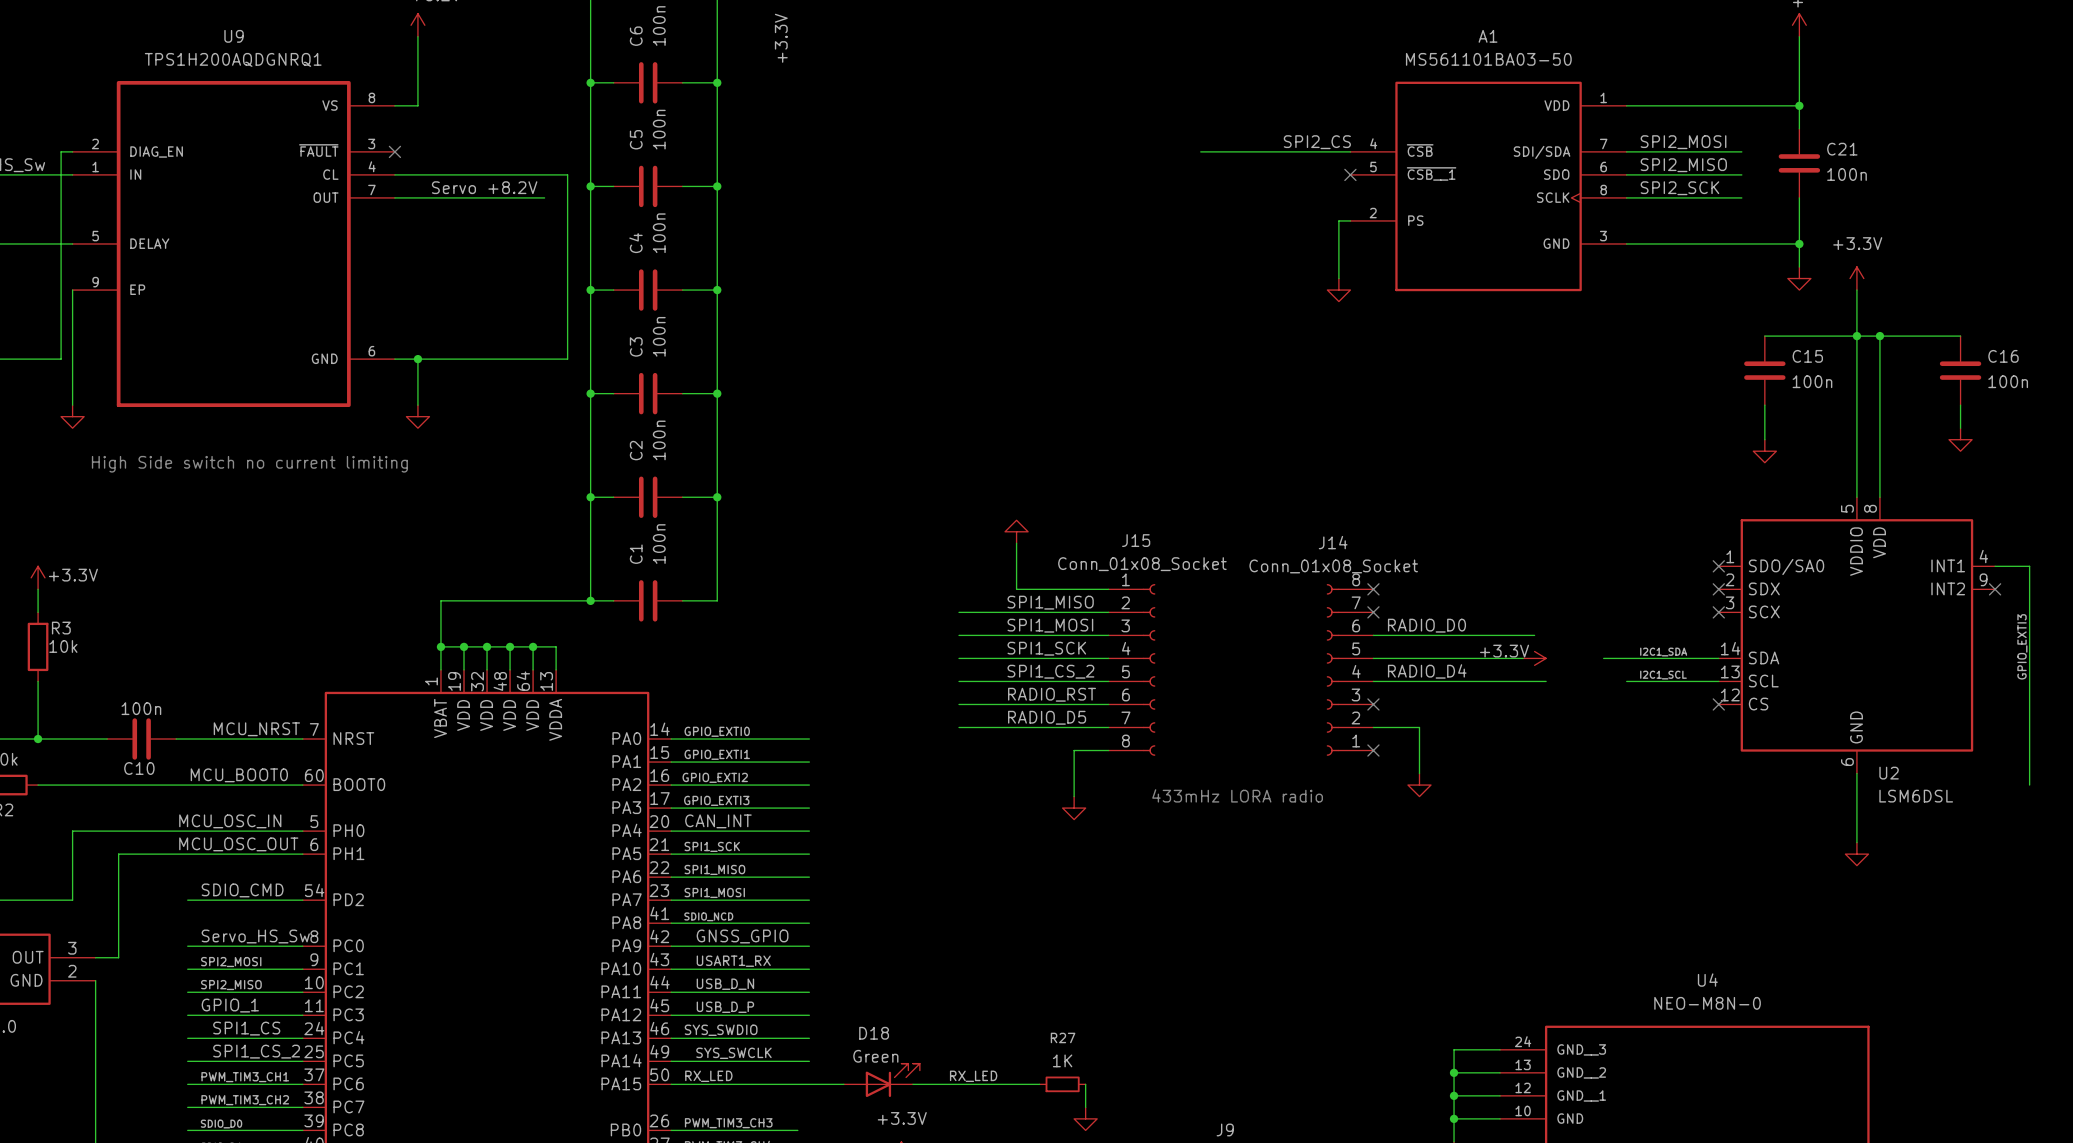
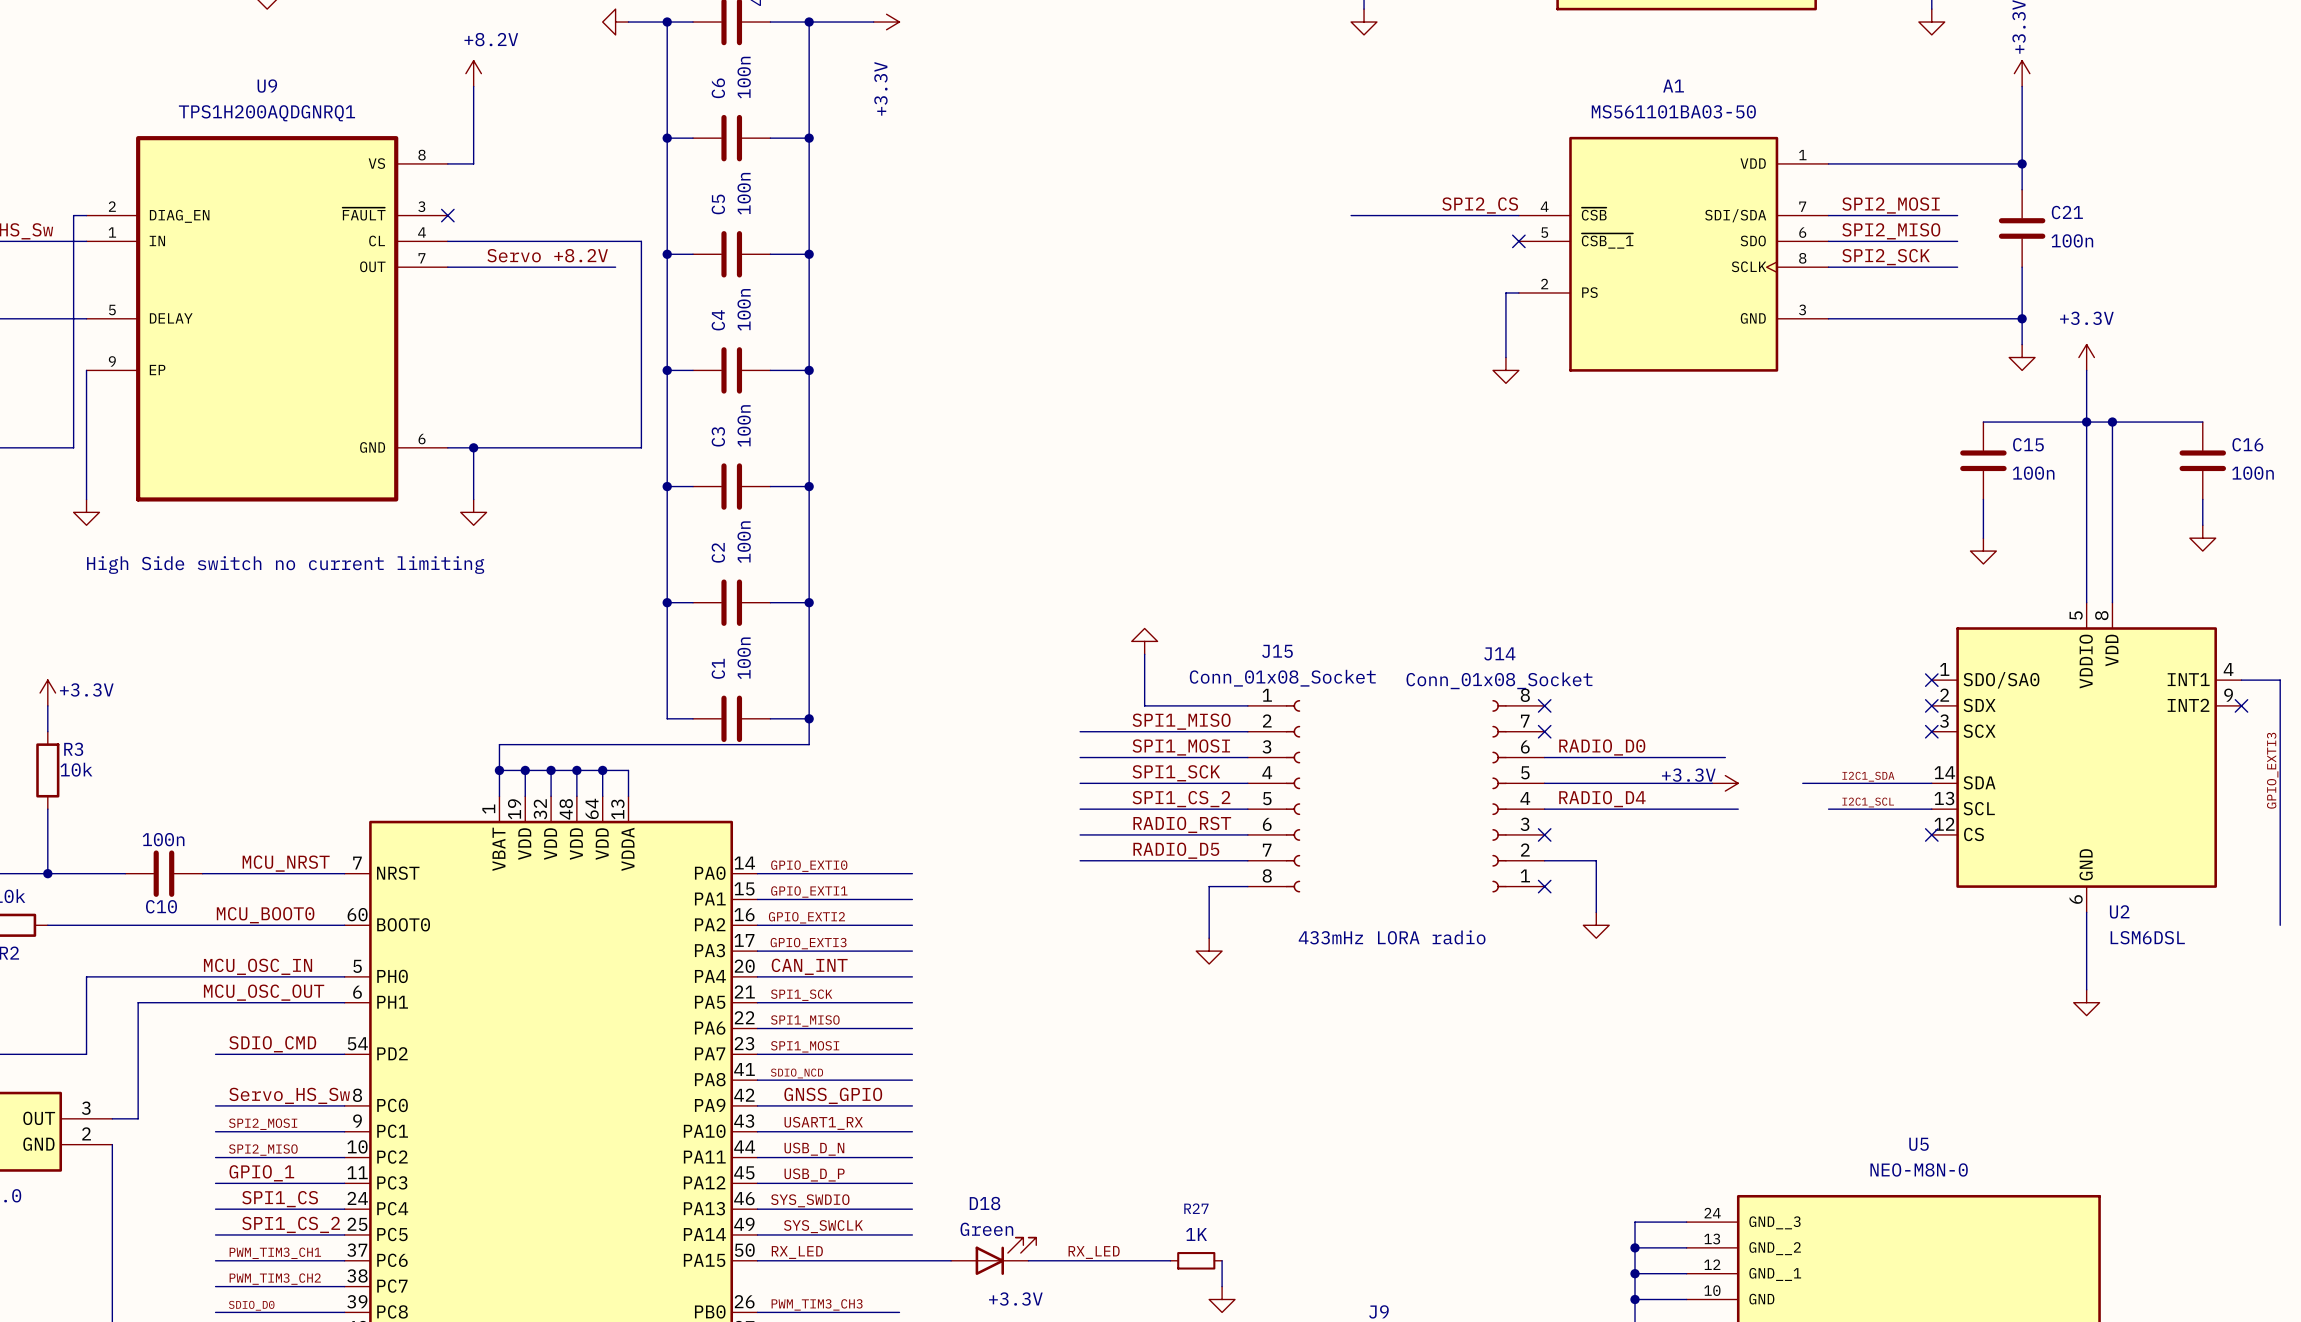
wire: (590, 600) (440, 600) (440, 623) -> (809, 718) (809, 744) (499, 744)
junction: (590, 600) -> none
junction: none -> (809, 718)
U4 name: U4 (1707, 980) -> U5 (1919, 1144)

